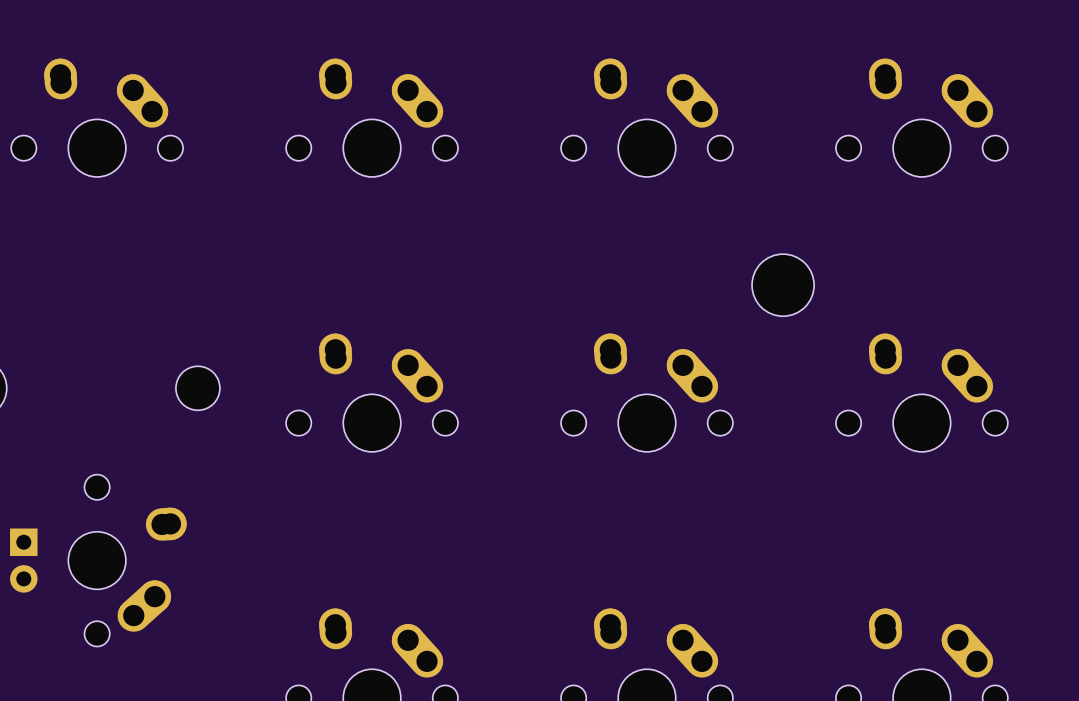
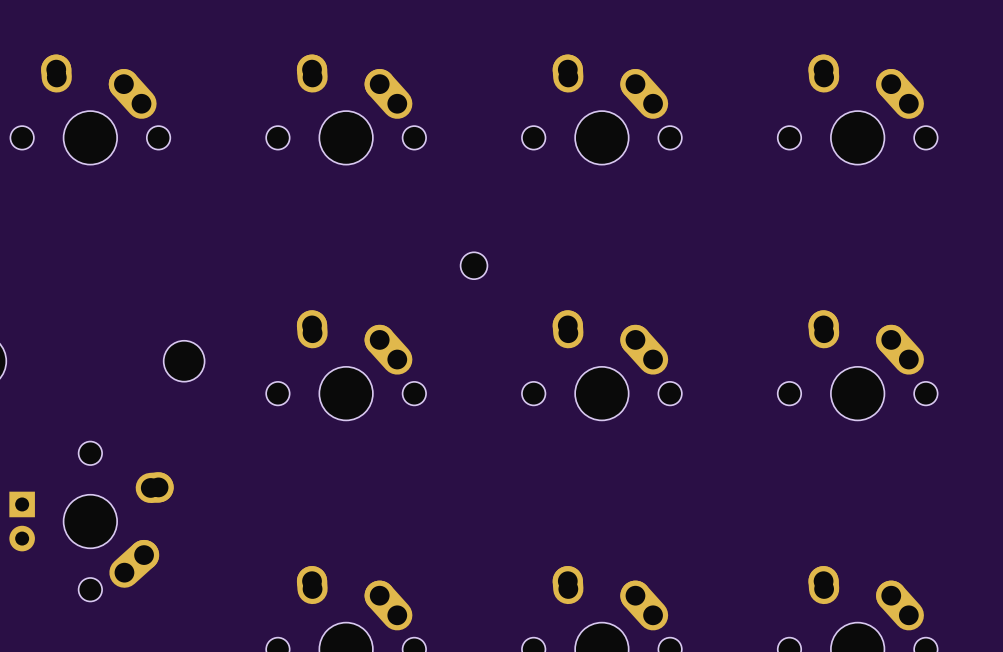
part: none -> (474, 265)
part: (783, 285) -> none

